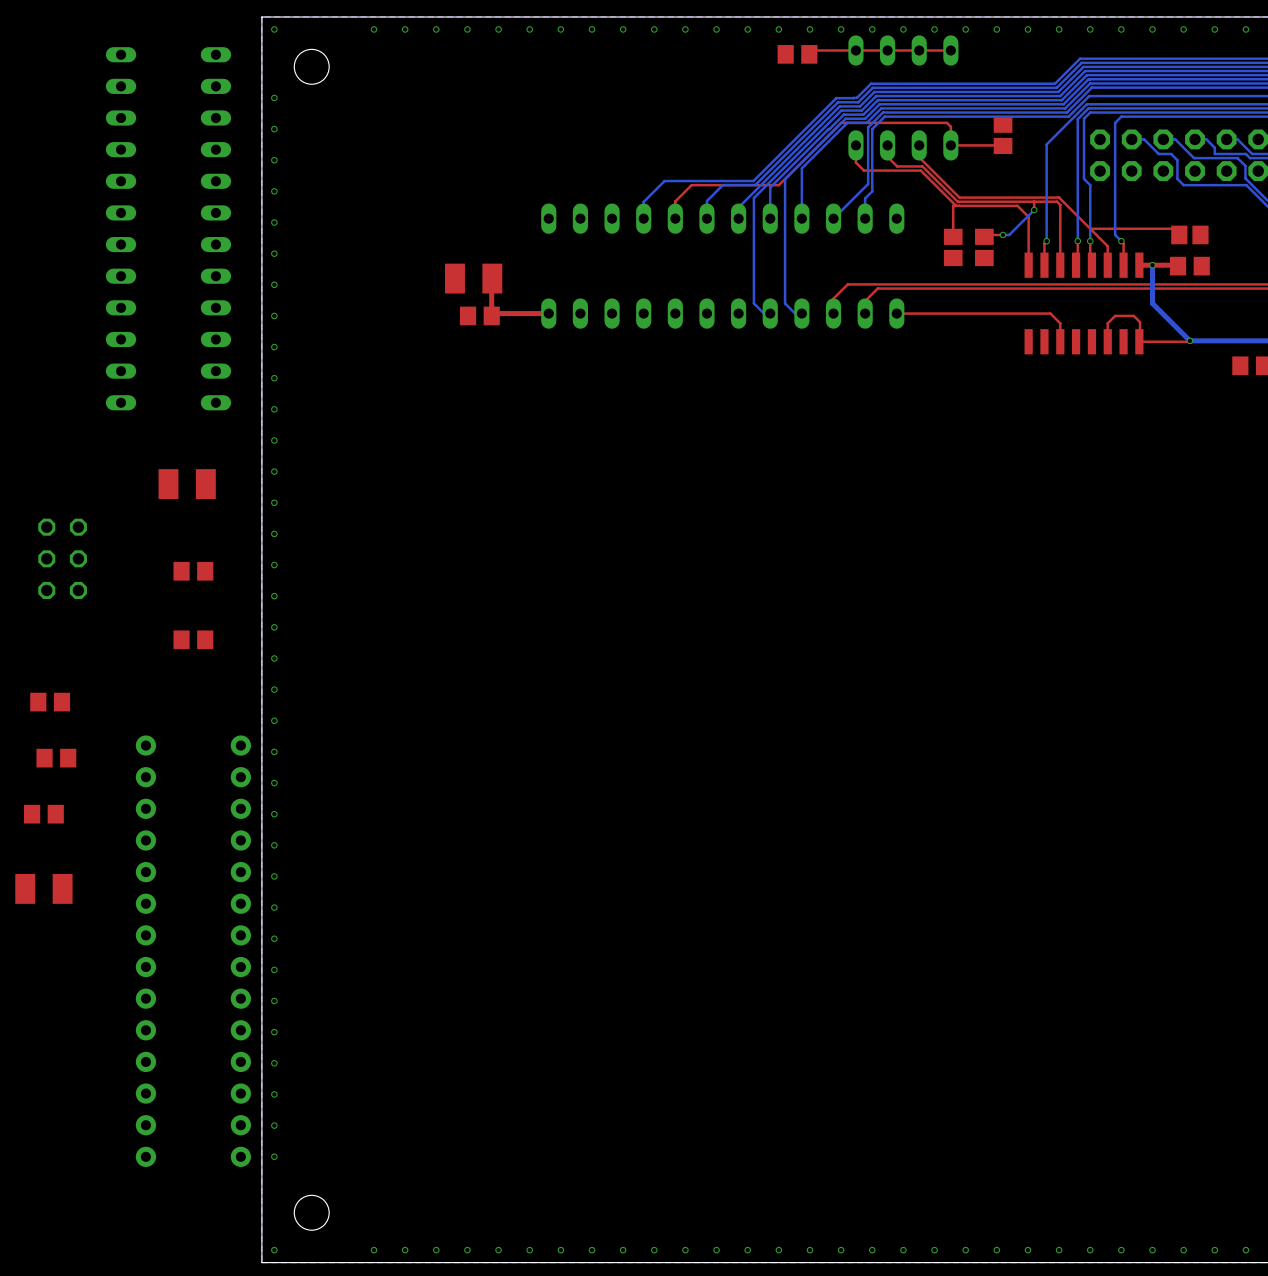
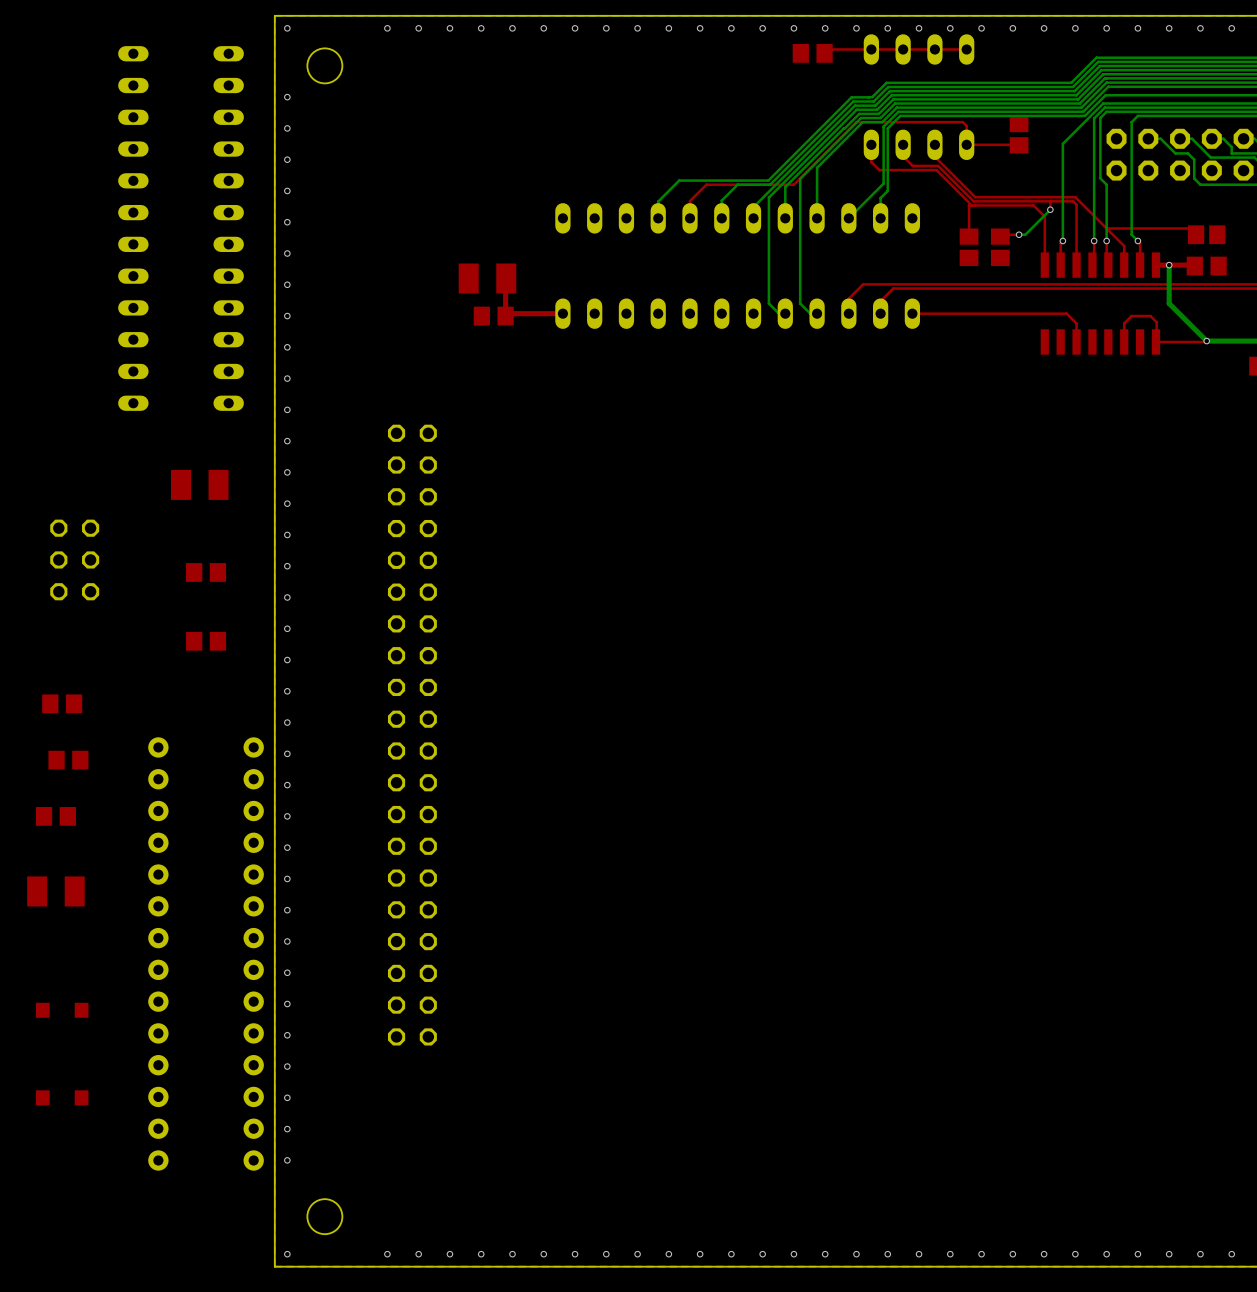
part: none -> (412, 735)
part: none -> (62, 1010)
part: none -> (62, 1097)

